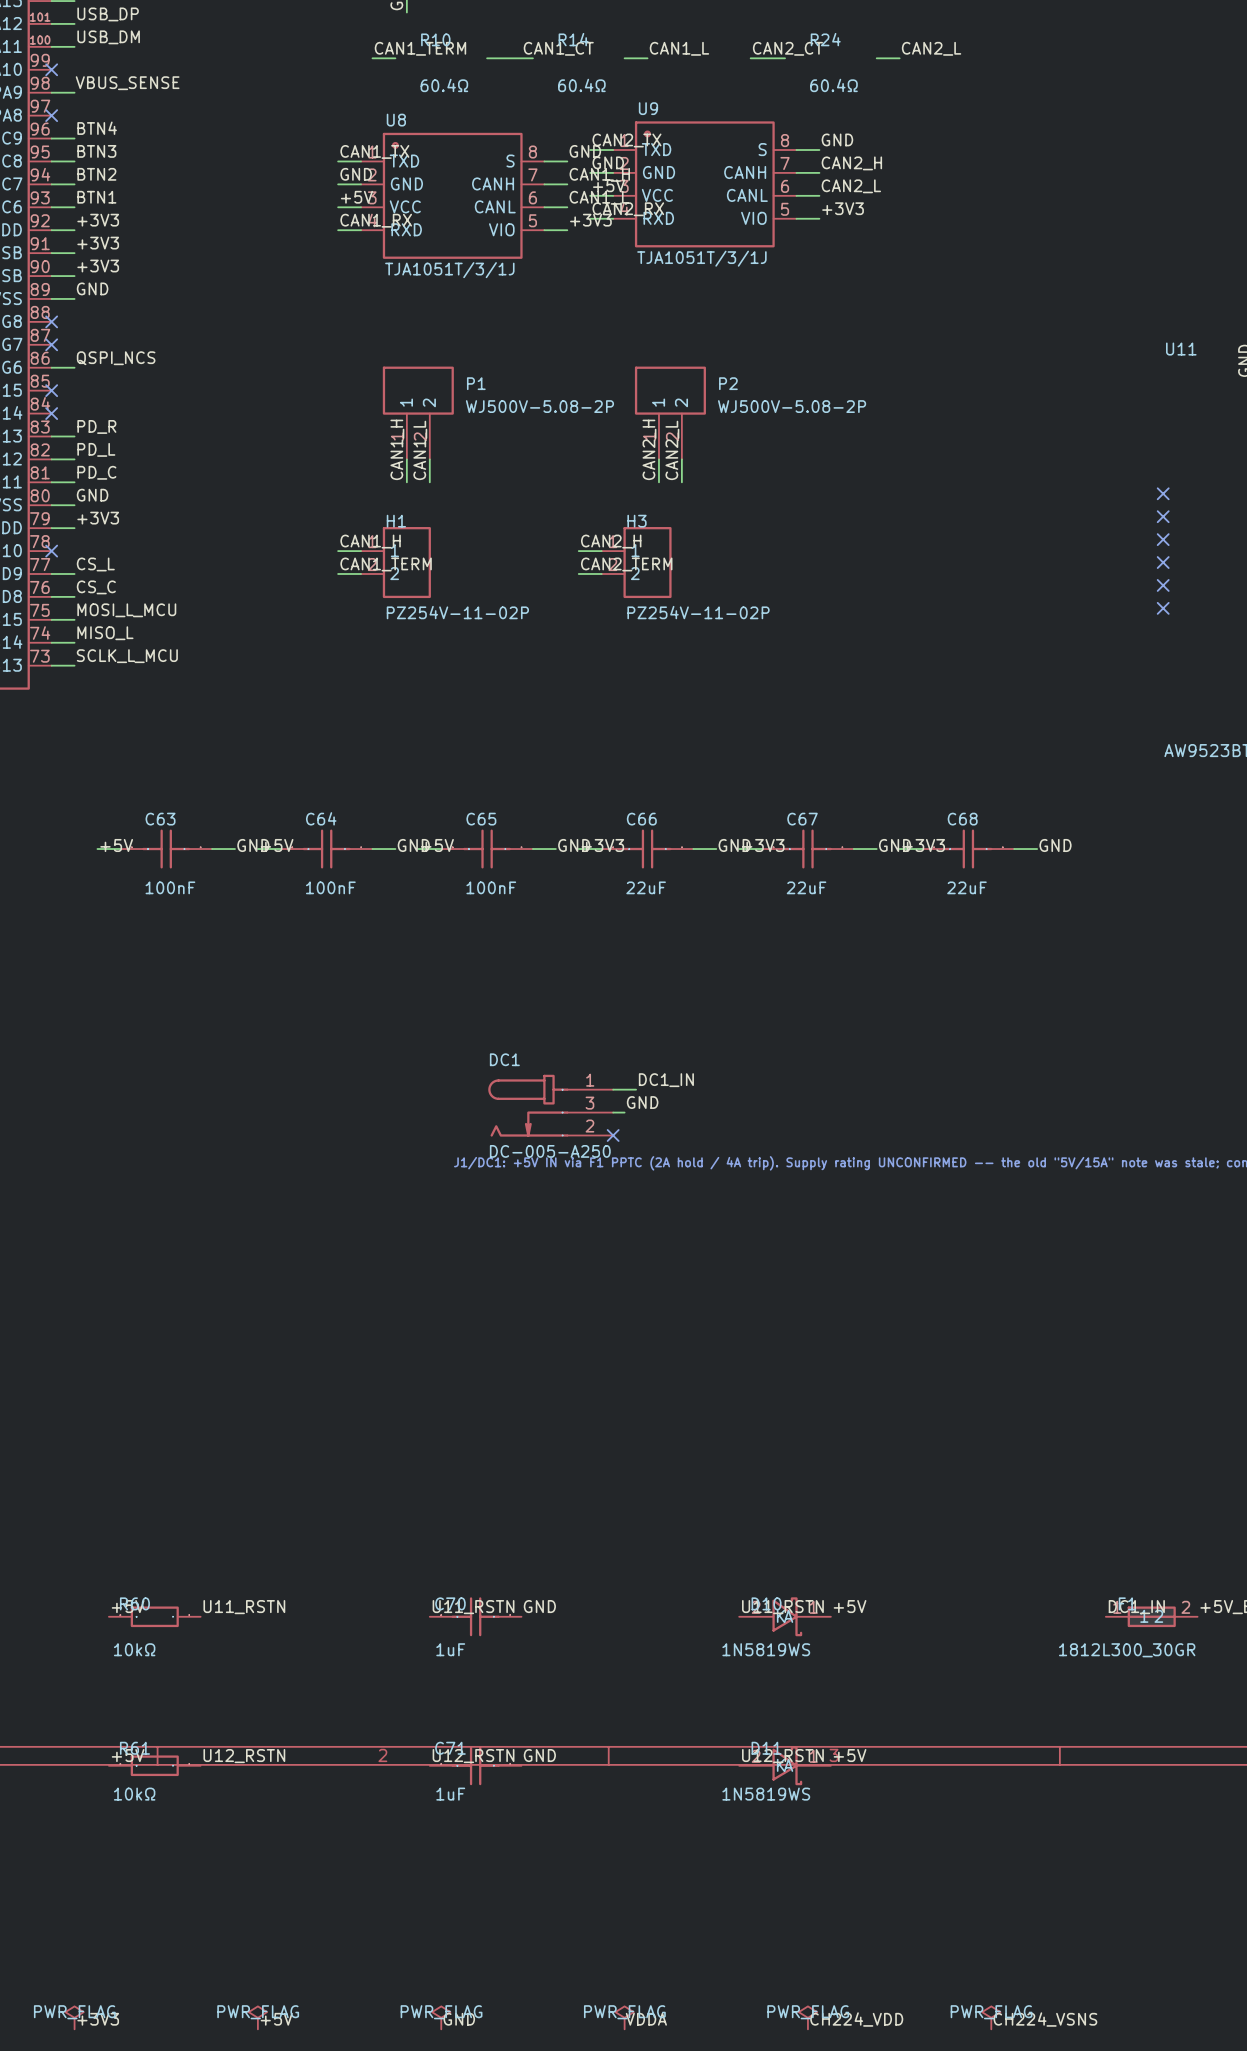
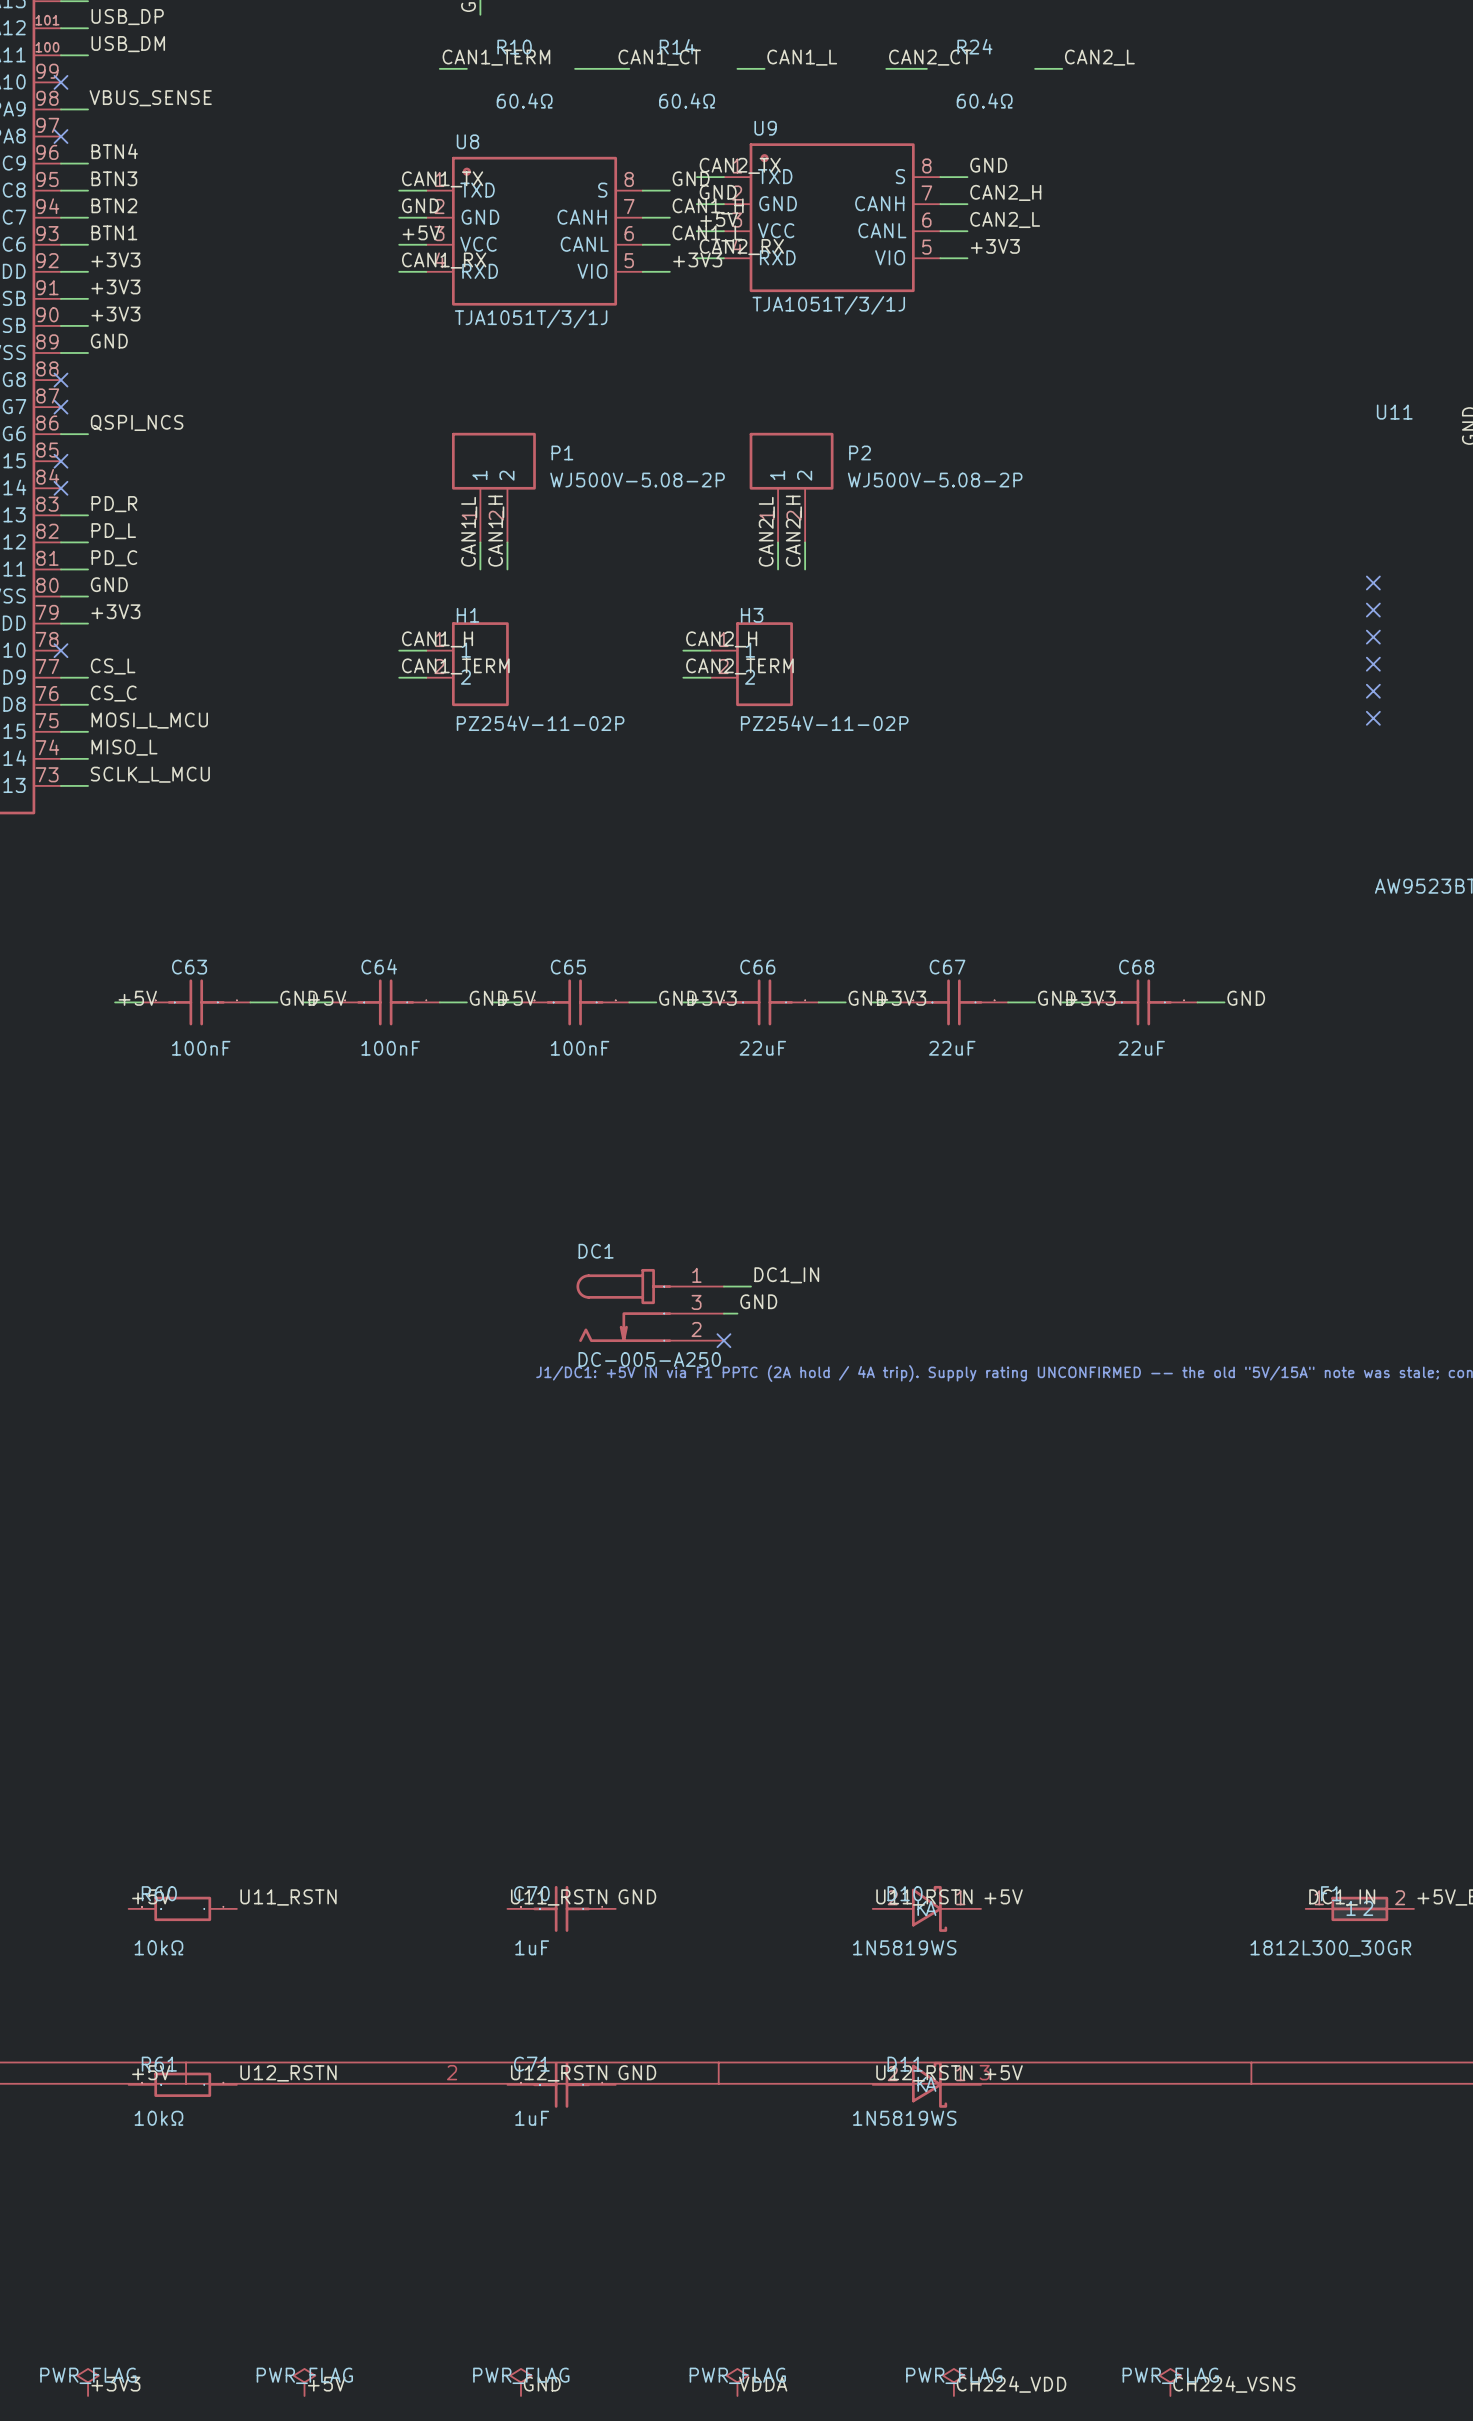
label: CAN1_H (397, 449) -> CAN1_L (469, 531)
label: CAN2_H (649, 449) -> CAN2_L (766, 531)
label: CAN1_L (420, 450) -> CAN1_H (496, 531)
label: CAN2_L (672, 450) -> CAN2_H (793, 531)

